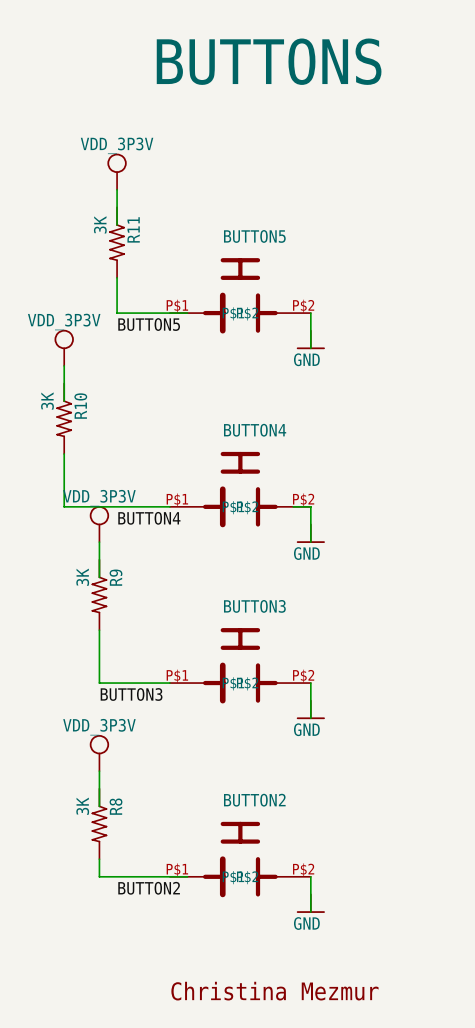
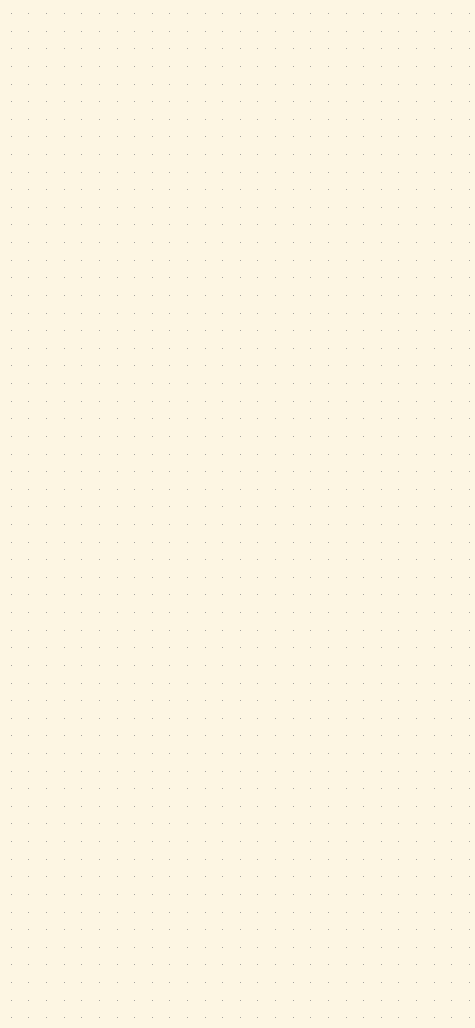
text: BUTTONS (269, 61) -> none
power symbol: VDD_3P3V (117, 171) -> none
wire: (117, 189) (117, 224) -> none
R11: 3K (117, 242) -> none
wire: (117, 277) (117, 313) (187, 313) -> none
BUTTON5: (240, 295) -> none
wire: (310, 313) (310, 348) -> none
label: BUTTON5 (149, 324) -> none
power symbol: GND (310, 339) -> none
power symbol: VDD_3P3V (64, 347) -> none
wire: (64, 365) (64, 401) -> none
R10: 3K (64, 418) -> none
wire: (64, 454) (64, 506) (169, 506) -> none
BUTTON4: (240, 489) -> none
wire: (293, 506) (310, 506) (310, 542) -> none
label: BUTTON4 (149, 518) -> none
power symbol: VDD_3P3V (99, 524) -> none
power symbol: GND (310, 533) -> none
wire: (99, 542) (99, 577) -> none
R9: 3K (99, 594) -> none
wire: (99, 630) (99, 683) (169, 683) -> none
BUTTON3: (240, 665) -> none
wire: (310, 683) (310, 718) -> none
label: BUTTON3 (131, 694) -> none
power symbol: GND (310, 709) -> none
power symbol: VDD_3P3V (99, 753) -> none
wire: (99, 771) (99, 806) -> none
R8: 3K (99, 823) -> none
wire: (99, 859) (99, 876) (187, 876) -> none
BUTTON2: (240, 859) -> none
wire: (310, 876) (310, 912) -> none
label: BUTTON2 (149, 888) -> none
power symbol: GND (310, 903) -> none
text: Christina Mezmur (274, 991) -> none

